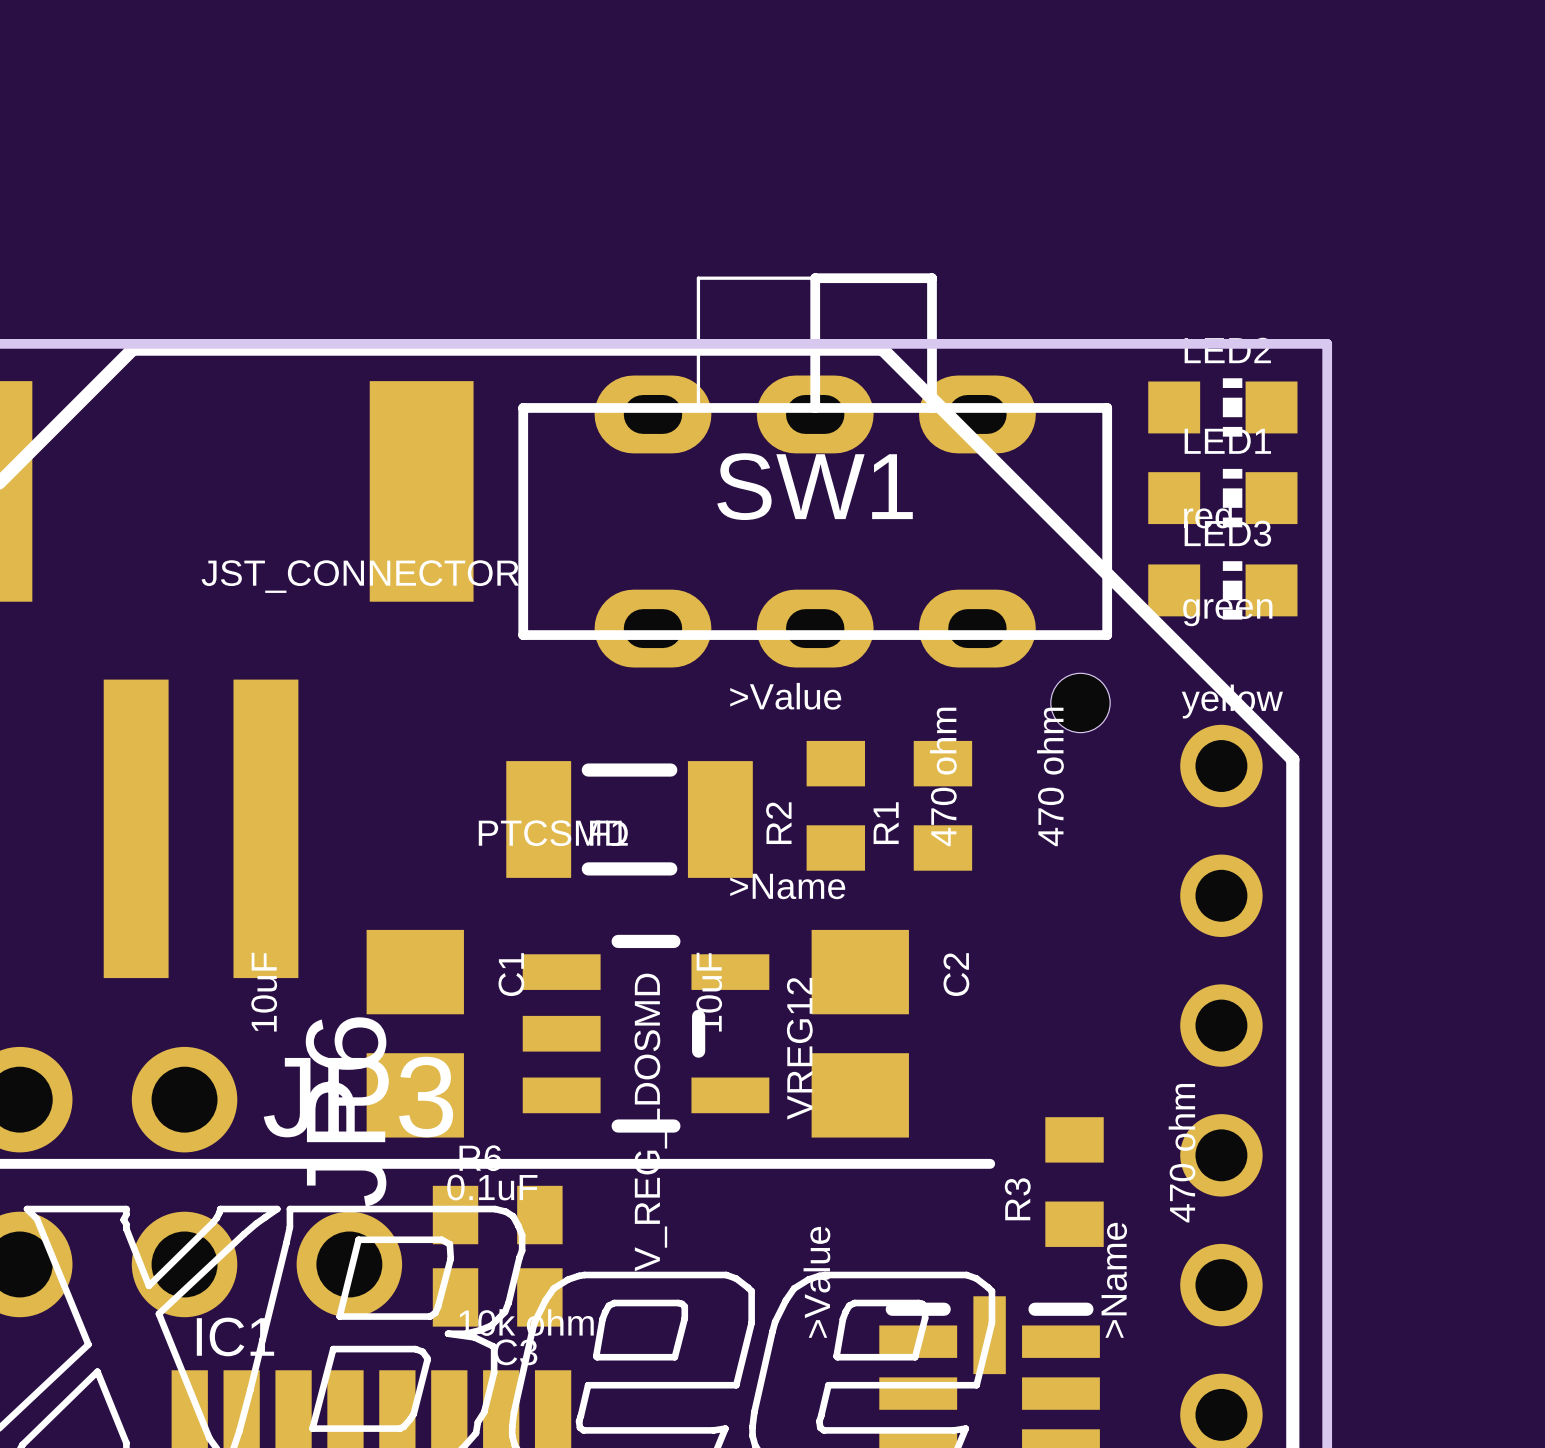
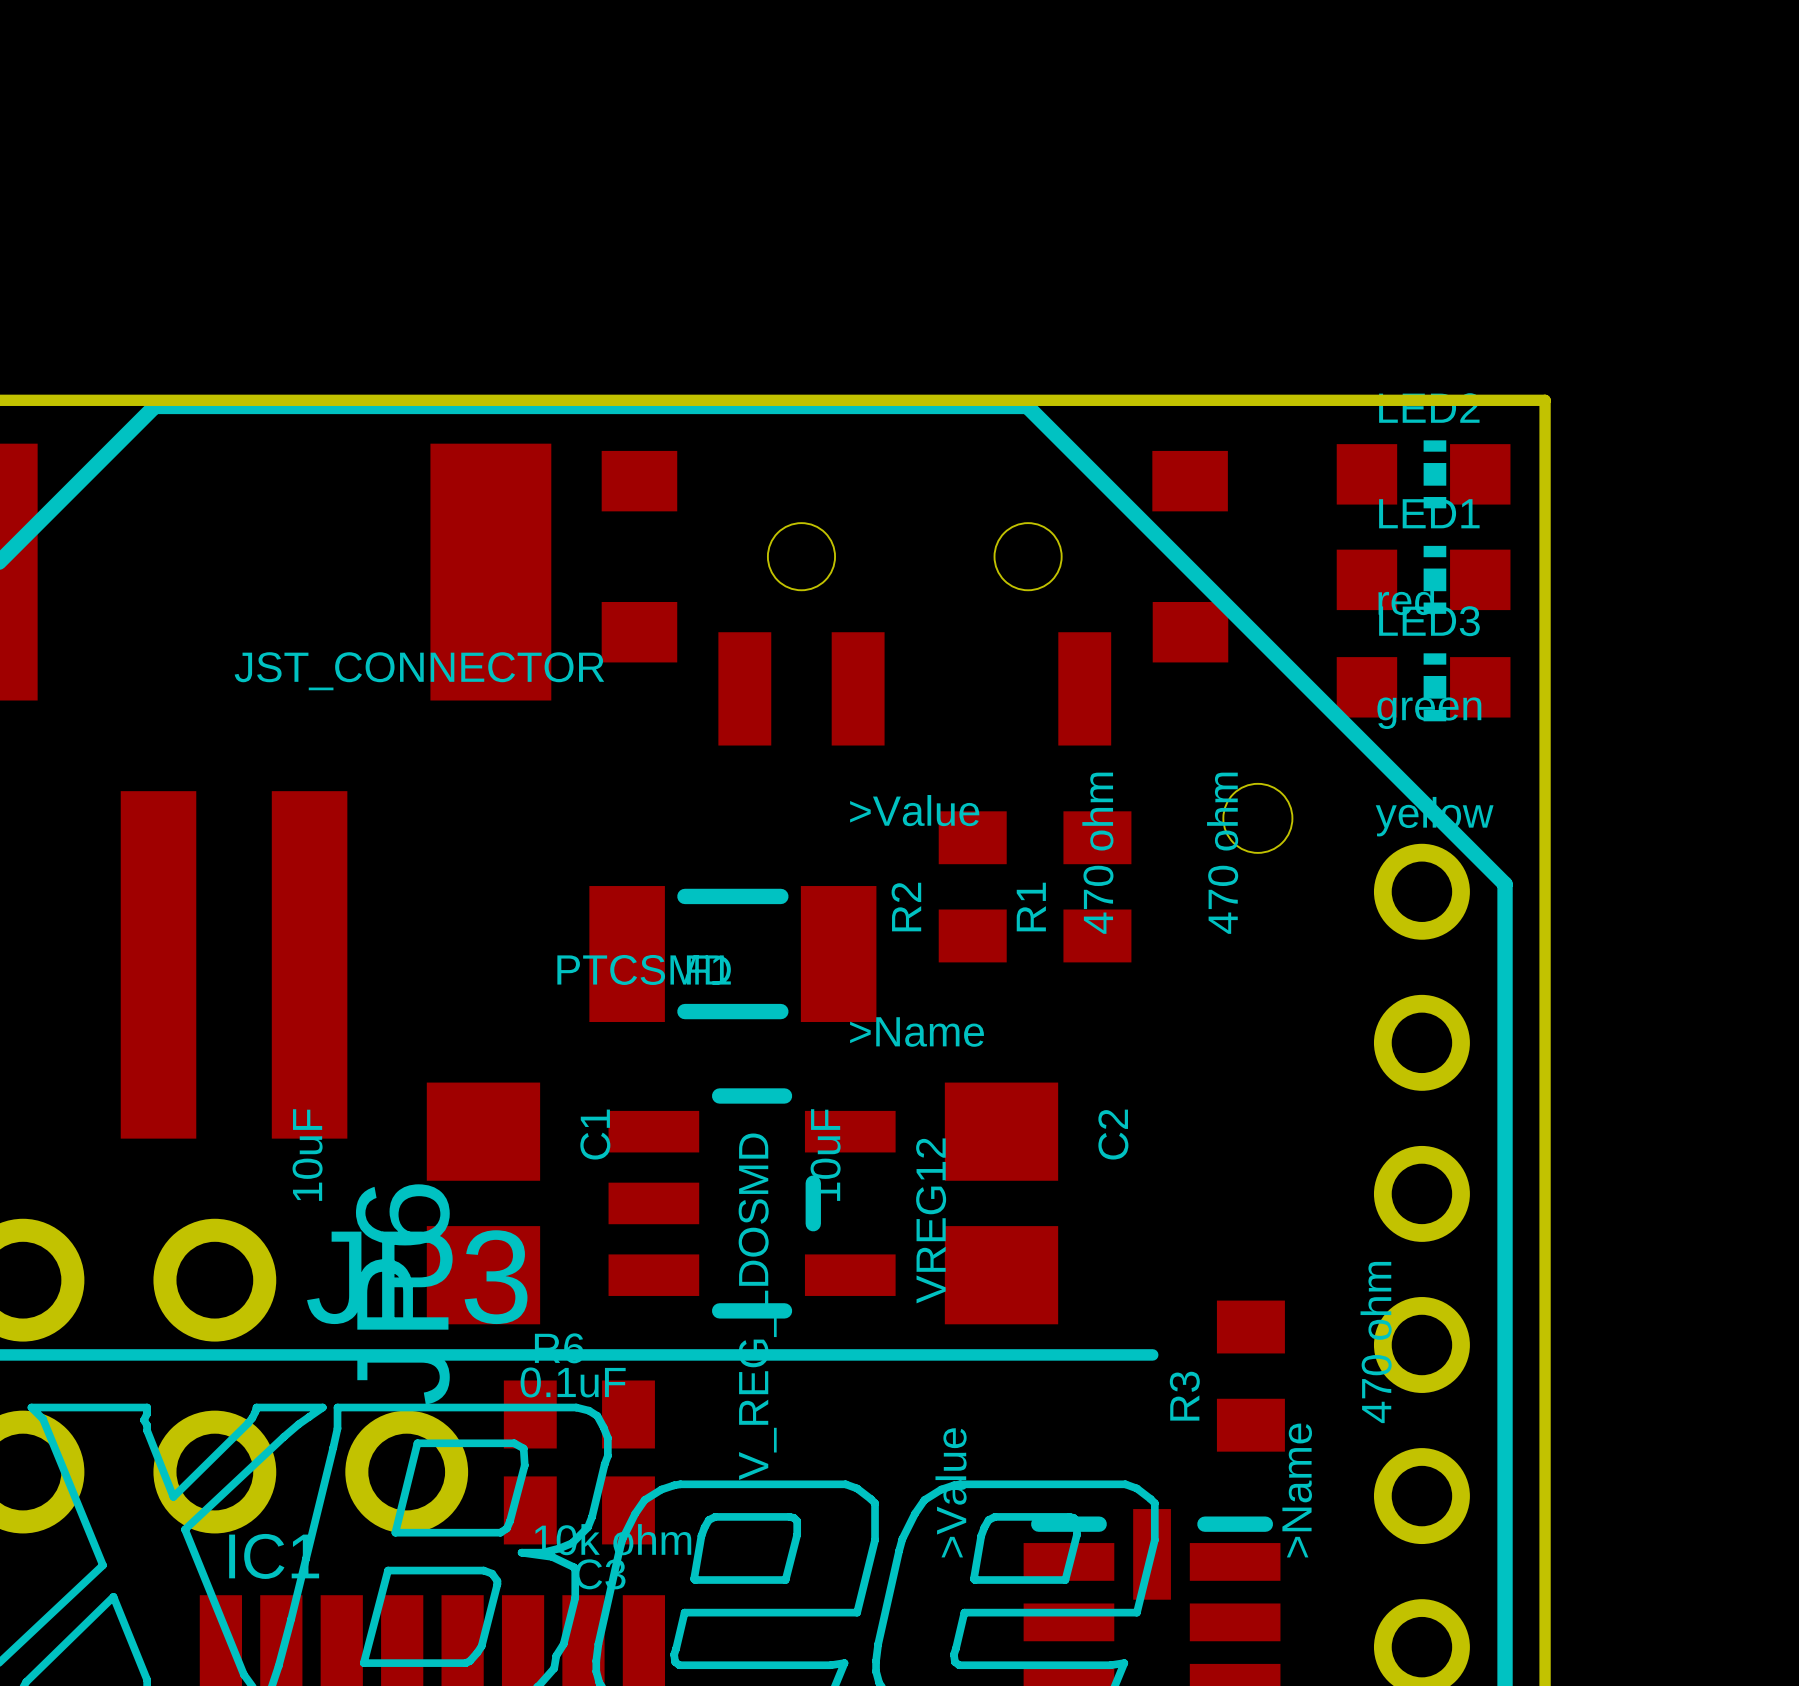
SW1: (815, 470) -> none
part: none -> (914, 598)
R2 position: (835, 805) -> (972, 886)
R1 position: (942, 805) -> (1097, 886)

